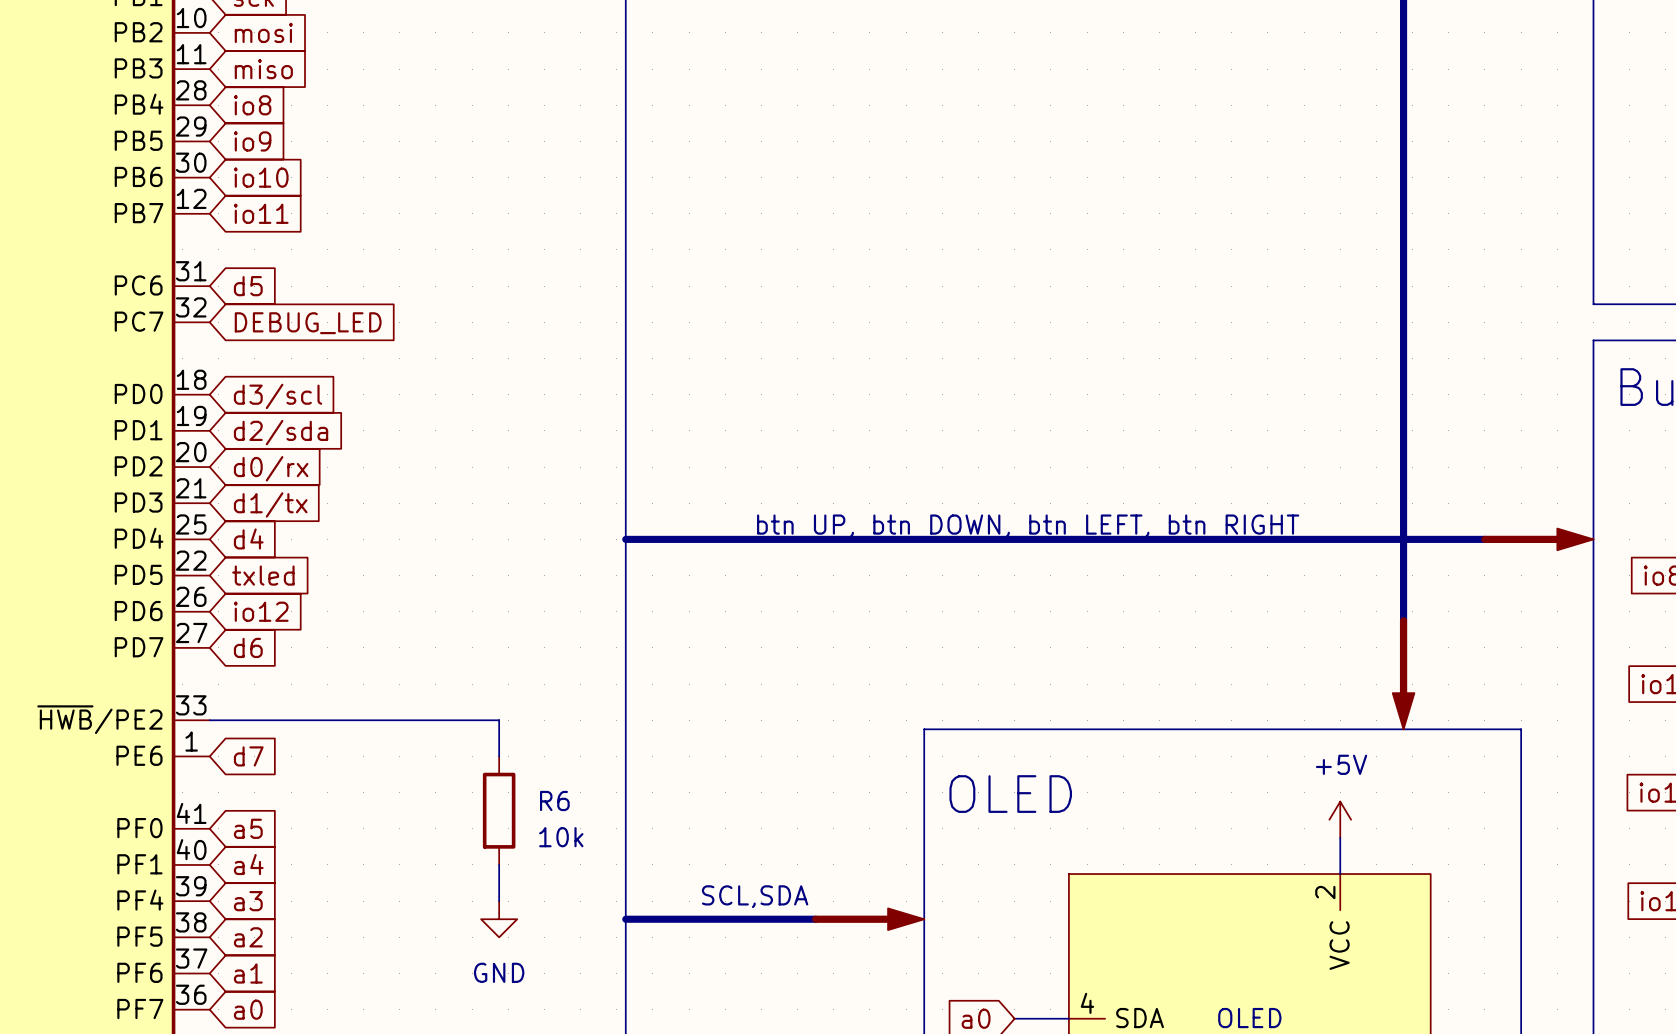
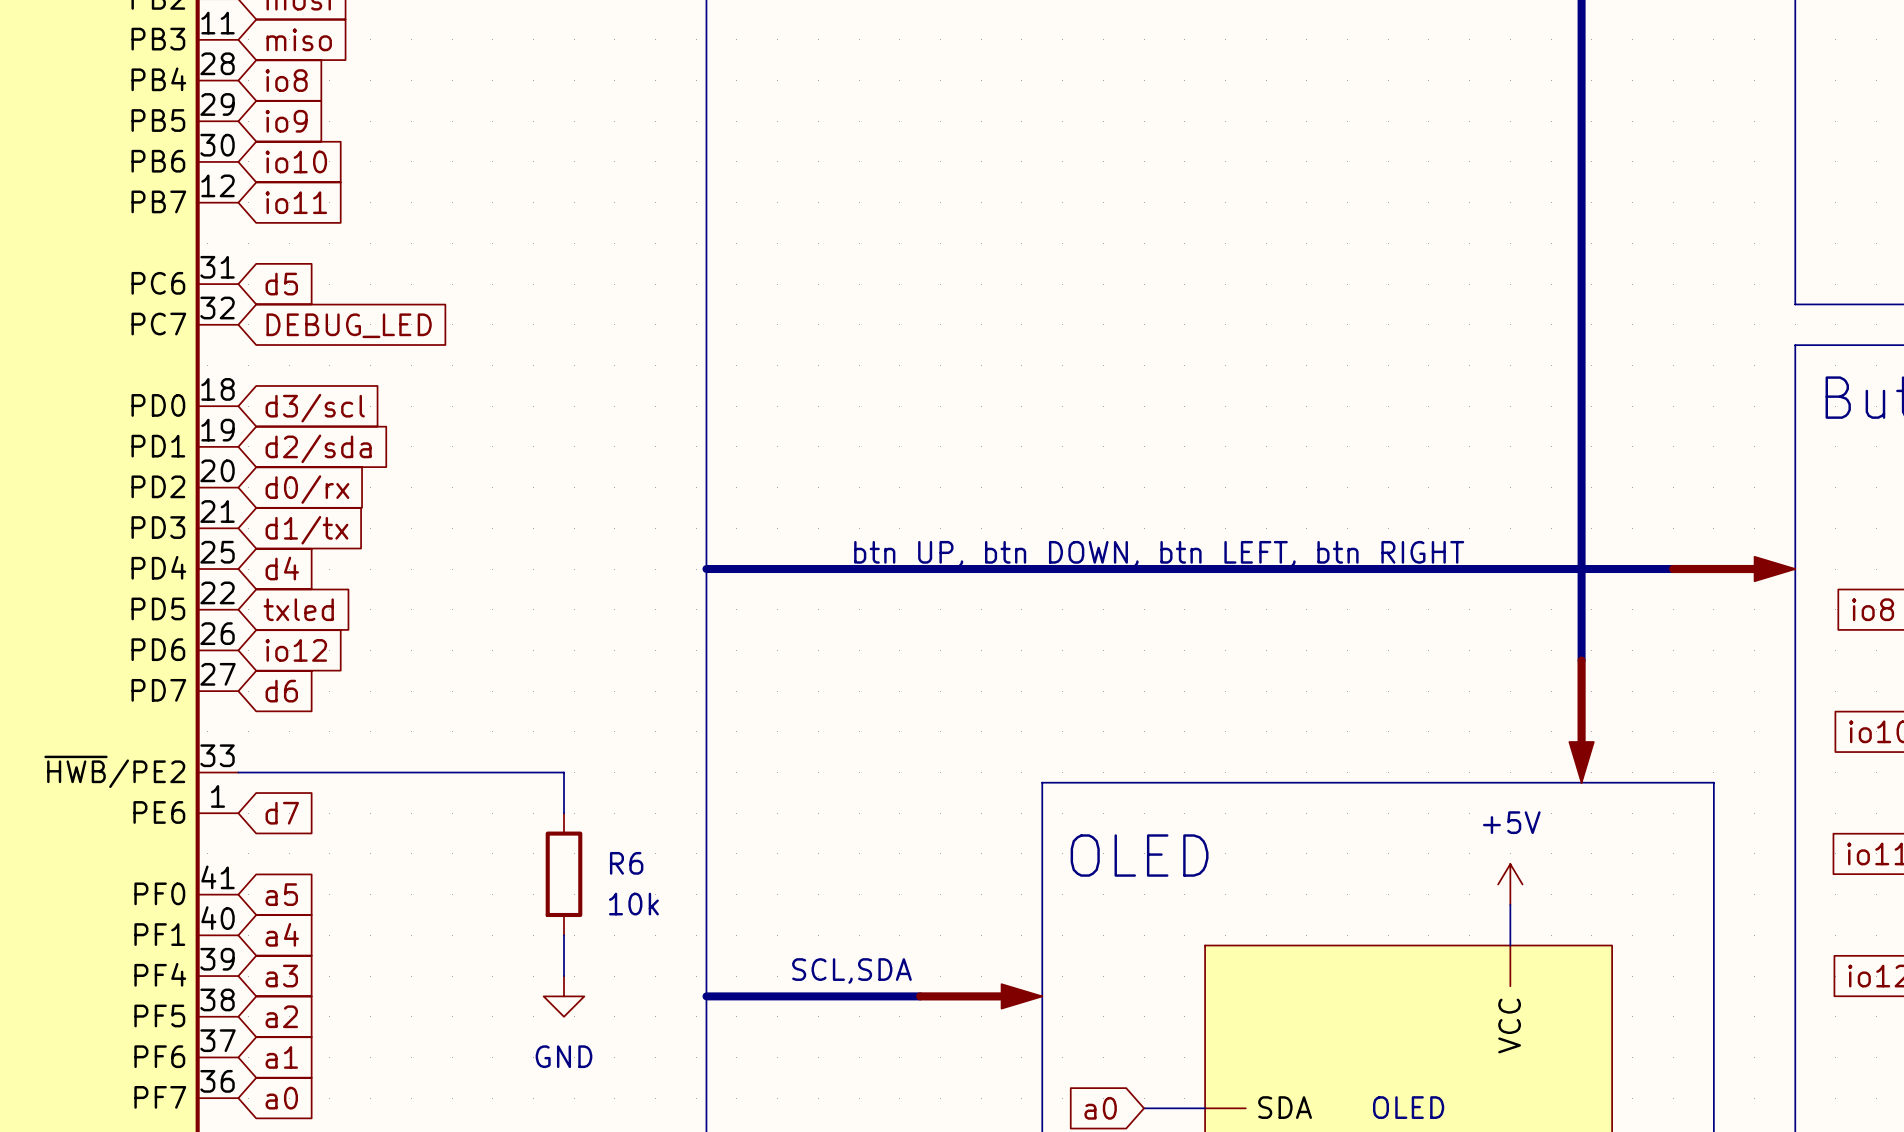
part pin number: 2 (1325, 892) -> none
part pin number: 4 (1087, 1003) -> none

